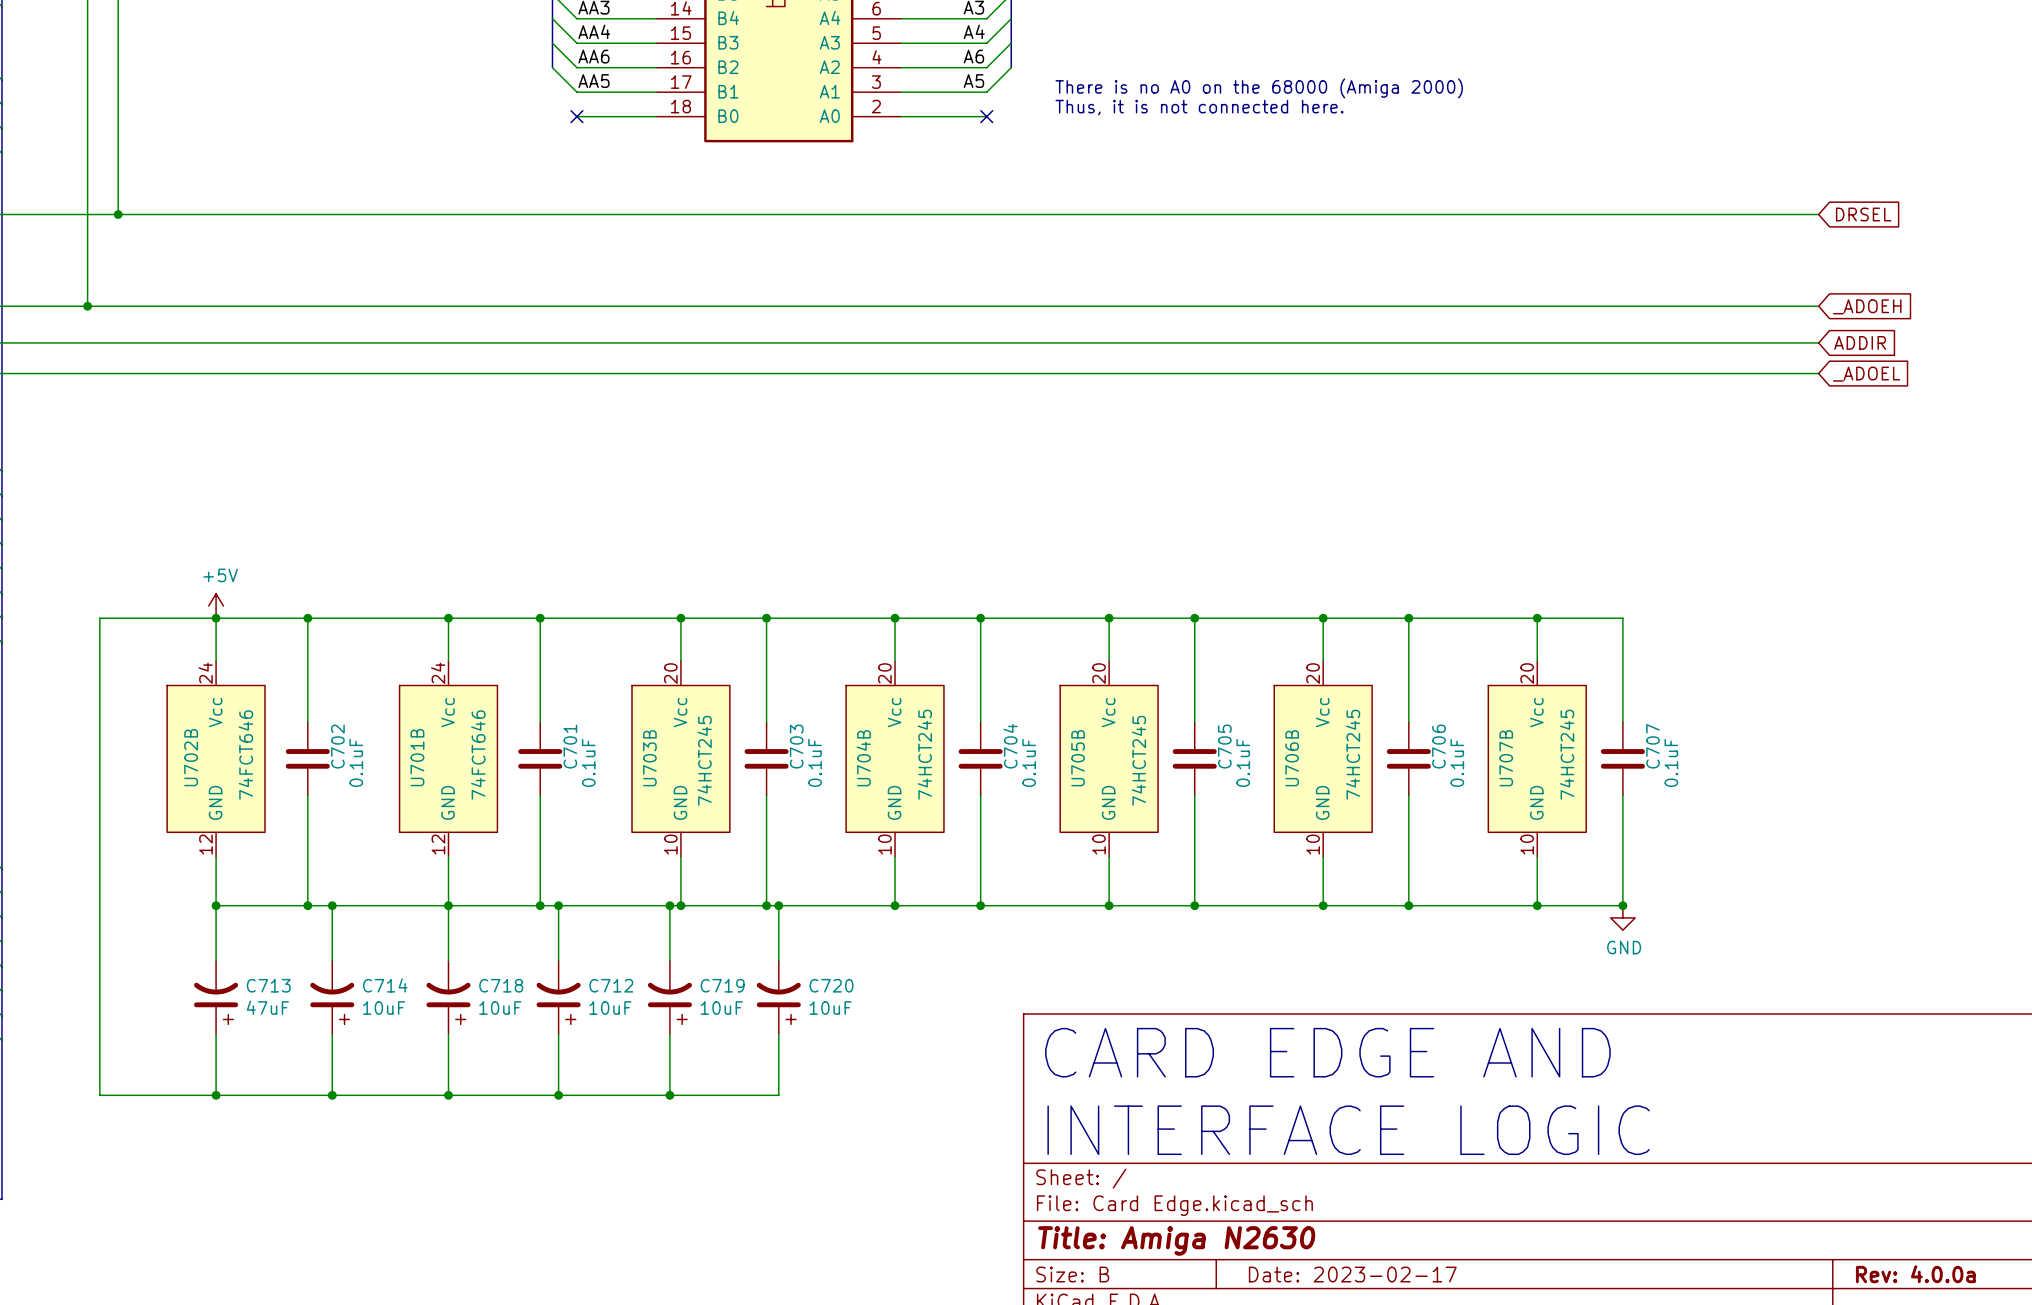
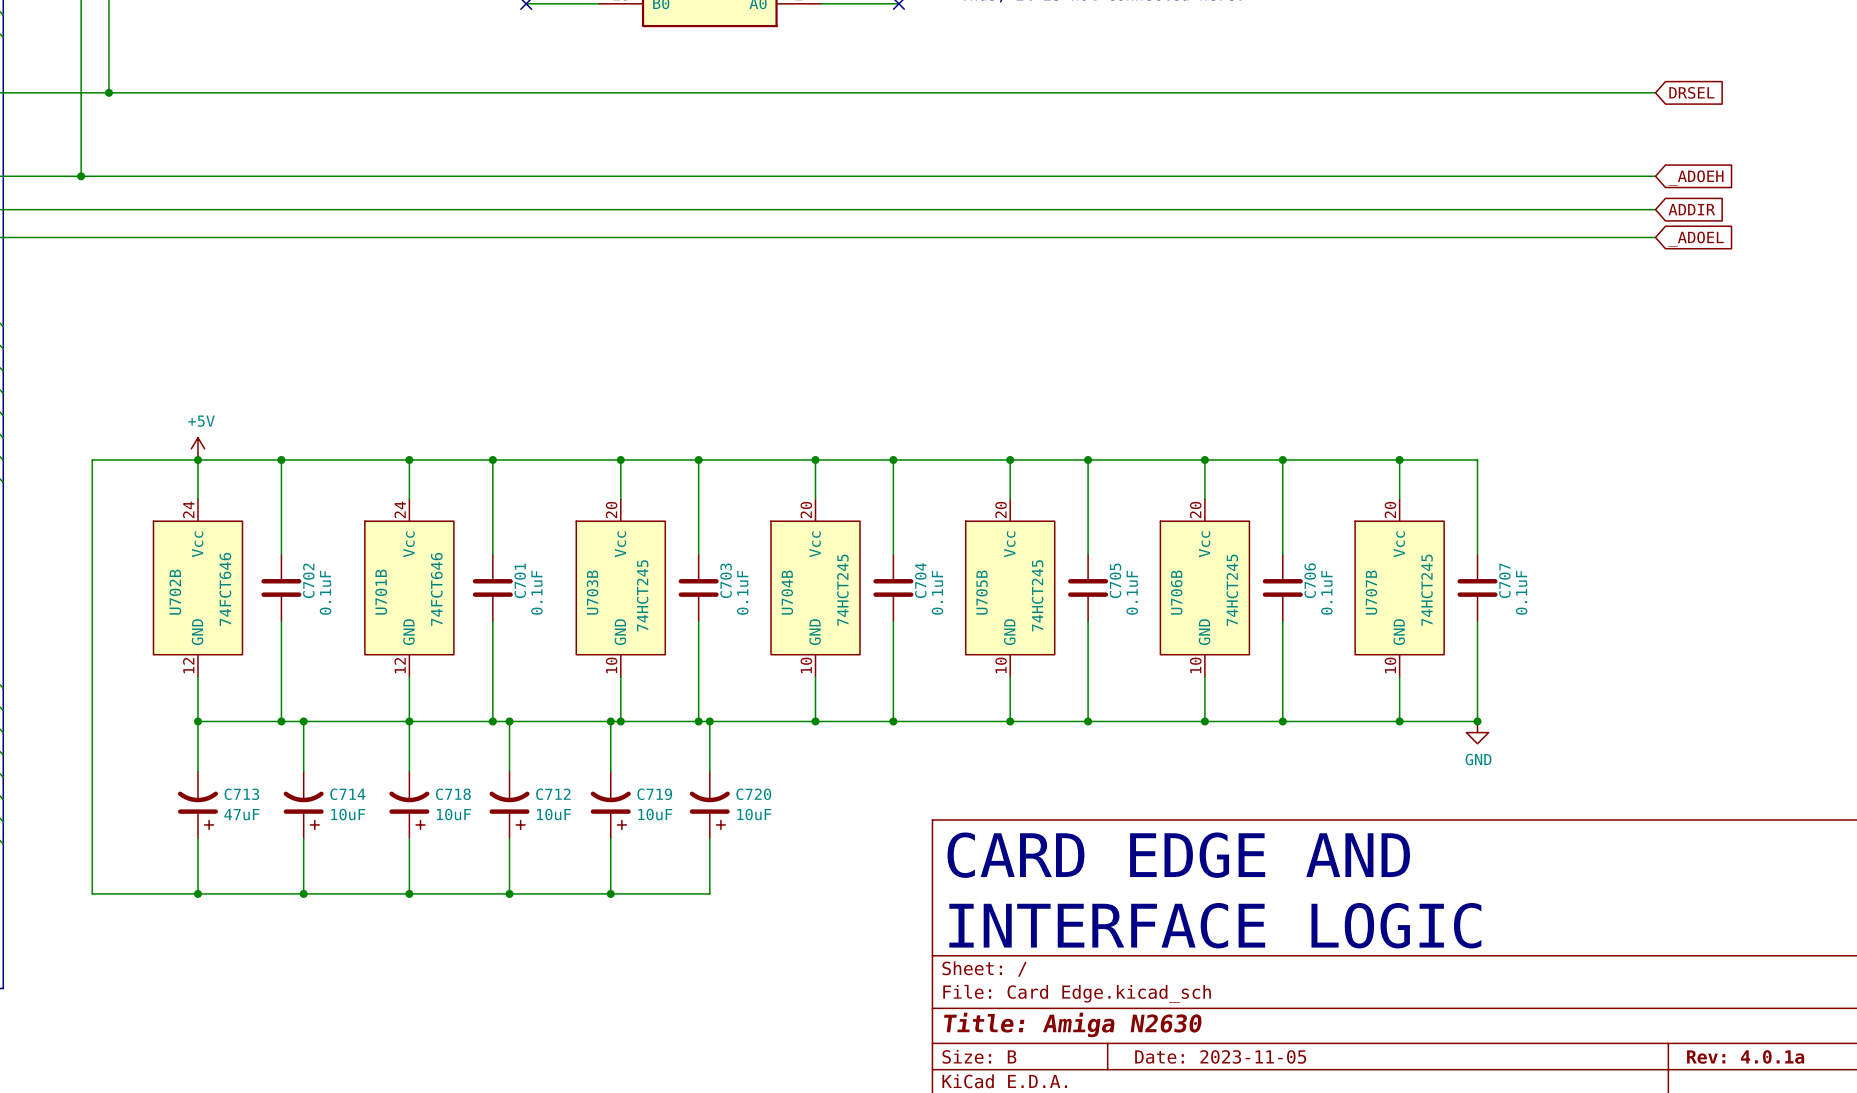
title block: Date: 2023-02-17 (1352, 1274) -> Date: 2023-11-05 (1220, 1056)
title block: Rev: 4.0.0a (1915, 1274) -> Rev: 4.0.1a (1745, 1056)

